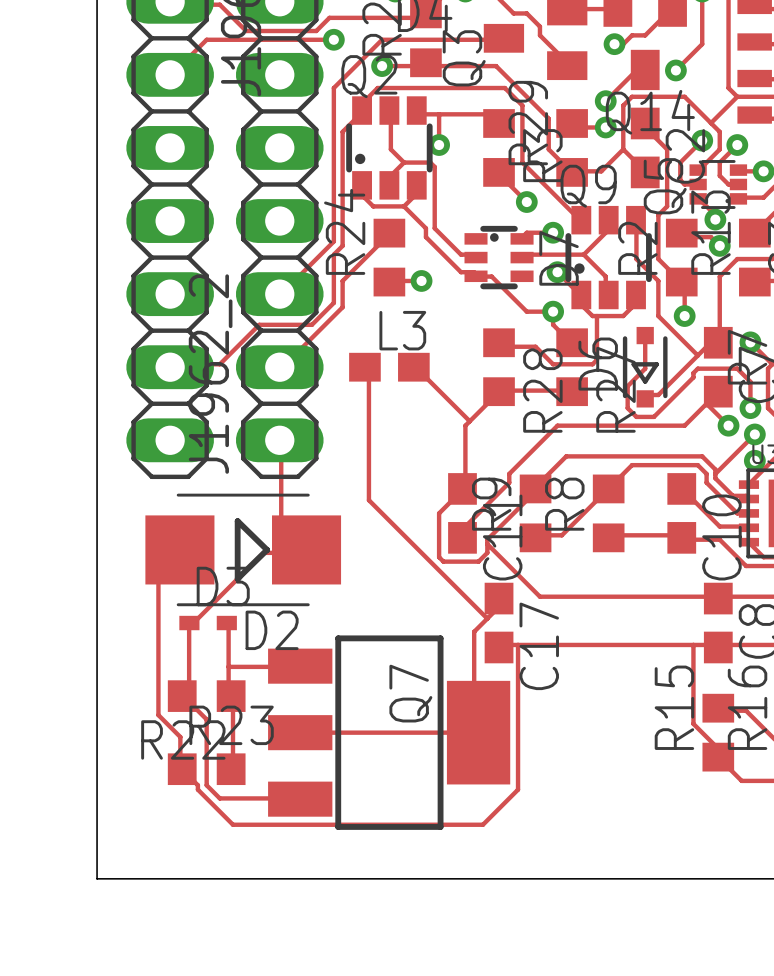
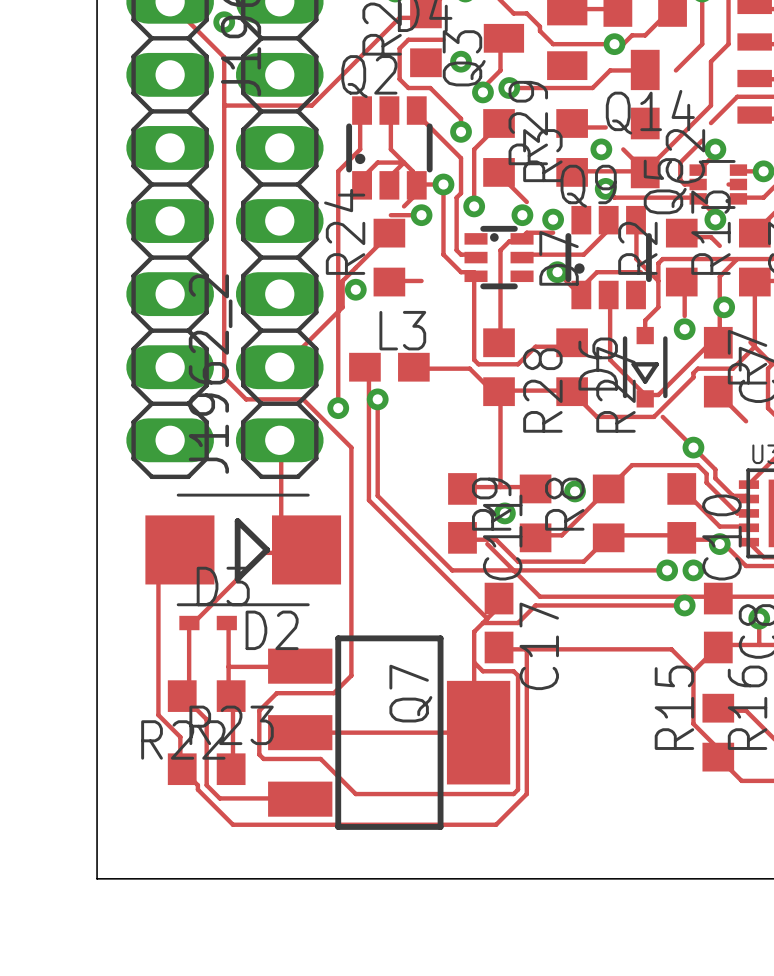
track: (171, 4) (219, 4) (246, 31) (316, 31) (329, 17) (399, 17) -> (224, 105) (311, 105) (399, 17)
track: none -> (171, 4) (224, 57) (224, 377) (246, 399) (303, 399) (351, 447) (351, 675) (333, 693) (276, 693) (259, 710) (259, 754) (263, 758) (320, 758) (355, 794) (513, 794)
via: none -> (224, 22)
track: (539, 31) (539, 35) (566, 61) -> (539, 31) (553, 44) (605, 44)
track: (333, 39) (206, 39) (170, 74) -> none
via: (333, 39) -> none
track: (408, 39) (382, 39) (333, 88) (333, 241) (279, 294) -> none
track: (443, 39) (500, 39) -> (482, 92) (482, 88) (500, 70) (500, 39)
track: (728, 44) (728, 88) (737, 96) -> none
via: none -> (461, 61)
track: (382, 66) (496, 66) (548, 118) (548, 149) (572, 172) -> none
via: (382, 66) -> none
track: (636, 70) (605, 101) -> (636, 70) (610, 70) (592, 88) (509, 88)
via: (675, 70) -> none
track: (408, 88) (377, 88) (364, 101) (364, 109) (362, 110) -> (408, 88) (399, 79) (399, 48) (408, 39)
track: (430, 88) (504, 88) (522, 105) (522, 162) (579, 219) -> (430, 88) (461, 118) (461, 131)
via: none -> (509, 88)
via: none -> (482, 92)
via: (605, 101) -> none
track: (360, 114) (342, 131) (342, 245) (333, 254) (333, 302) (311, 324) (259, 324) (219, 364) (171, 364) (170, 367) -> (360, 114) (360, 149) (338, 171) (338, 408)
track: (417, 114) (487, 114) (499, 123) -> (474, 206) (474, 149) (499, 123)
track: (439, 114) (439, 145) -> none
track: (645, 123) (645, 127) (667, 149) (667, 206) (658, 215) (658, 259) (681, 282) -> none
via position: (605, 127) -> (601, 149)
via: none -> (461, 131)
via position: (702, 140) -> (715, 149)
via: (439, 145) -> none
track: (737, 145) (719, 162) (719, 175) (728, 184) -> none
via: (737, 145) -> none
track: (715, 153) (719, 149) (719, 131) (684, 96) (632, 96) (623, 105) (623, 149) (601, 171) -> (728, 44) (710, 61) (710, 105) (645, 171) (601, 171)
track: (404, 162) (430, 162) (434, 166) (434, 228) (456, 250) -> (417, 114) (461, 158) (461, 193) (456, 197) (456, 250)
via: none -> (443, 184)
track: (362, 185) (364, 188) (364, 197) (373, 206) (404, 206) (425, 228) (425, 237) (443, 254) -> (362, 185) (364, 184) (364, 175) (377, 162) (404, 162) (412, 171) (412, 184) (443, 184) (443, 254)
track: none -> (605, 188) (614, 197) (698, 198)
via: none -> (605, 188)
via position: (526, 202) -> (522, 215)
via: none -> (474, 206)
track: none -> (390, 215) (421, 215)
via: none -> (421, 215)
via position: (553, 232) -> (553, 219)
via: (719, 245) -> none
track: (583, 254) (605, 276) (605, 294) (608, 294) -> (645, 394) (610, 359) (608, 294)
track: none -> (737, 259) (662, 259) (658, 263) (658, 280)
track: (476, 276) (491, 276) (526, 311) (553, 311) (553, 324) (572, 342) -> (476, 276) (474, 276) (474, 359) (478, 364) (518, 364) (535, 346) (570, 346) (572, 342)
via: (421, 280) -> none
via: none -> (355, 289)
track: (581, 294) (583, 298) (583, 307) (592, 316) (623, 316) (632, 307) (632, 298) (636, 294) -> (581, 294) (583, 294) (583, 285) (596, 272) (640, 272)
track: (658, 307) (658, 316) (697, 355) -> (658, 307) (645, 320) (645, 335)
via: none -> (724, 307)
via: (553, 311) -> none
track: (596, 316) (596, 359) (592, 364) (553, 364) (535, 346) (500, 346) (499, 342) -> (522, 238) (518, 241) (509, 241) (500, 250) (499, 342)
via position: (684, 316) -> (684, 329)
track: (645, 335) (645, 368) (627, 386) (627, 408) (636, 416) -> (572, 391) (596, 416) (636, 416)
via: (750, 342) -> none
track: (417, 368) (469, 421) -> (417, 368) (469, 368) (496, 394)
track: (732, 368) (737, 368) (750, 381) (750, 408) -> (732, 368) (754, 346) (754, 282)
track: none -> (499, 391) (500, 487)
track: none -> (718, 391) (746, 421)
track: (496, 394) (465, 425) (465, 487) -> (535, 487) (465, 487)
via: none -> (377, 399)
via: none -> (338, 408)
via: (750, 408) -> none
track: (728, 425) (706, 403) (718, 391) (684, 425) (557, 425) (509, 473) (509, 482) (465, 526) (465, 535) (462, 537) -> (608, 537) (583, 561) (518, 561) (496, 539) (465, 539) (462, 537)
via: (728, 425) -> none
track: (754, 434) (715, 473) -> none
via: (754, 434) -> none
via: none -> (693, 447)
track: (702, 456) (566, 456) (535, 487) -> (702, 456) (662, 416)
via: (754, 460) -> none
track: (462, 488) (439, 513) (439, 557) -> (377, 399) (377, 495) (439, 557)
track: (535, 488) (535, 491) (487, 539) (487, 552) (478, 561) (443, 561) -> (667, 570) (452, 570) (443, 561)
via: none -> (575, 491)
via: none -> (504, 513)
via: none -> (719, 544)
via: none -> (667, 570)
via: none -> (693, 570)
track: none -> (684, 605) (535, 605) (518, 623) (482, 623)
via: none -> (684, 605)
via: none -> (759, 618)
track: (518, 644) (518, 675) -> (474, 662) (482, 671) (513, 671) (518, 675)
track: (693, 644) (693, 671) -> (759, 618) (759, 644)
track: (499, 647) (500, 644) (715, 644) (718, 647) -> (499, 647) (500, 649) (671, 649) (693, 671) (718, 647)
track: (513, 794) (482, 824) -> (526, 649) (526, 794) (496, 824) (482, 824)

